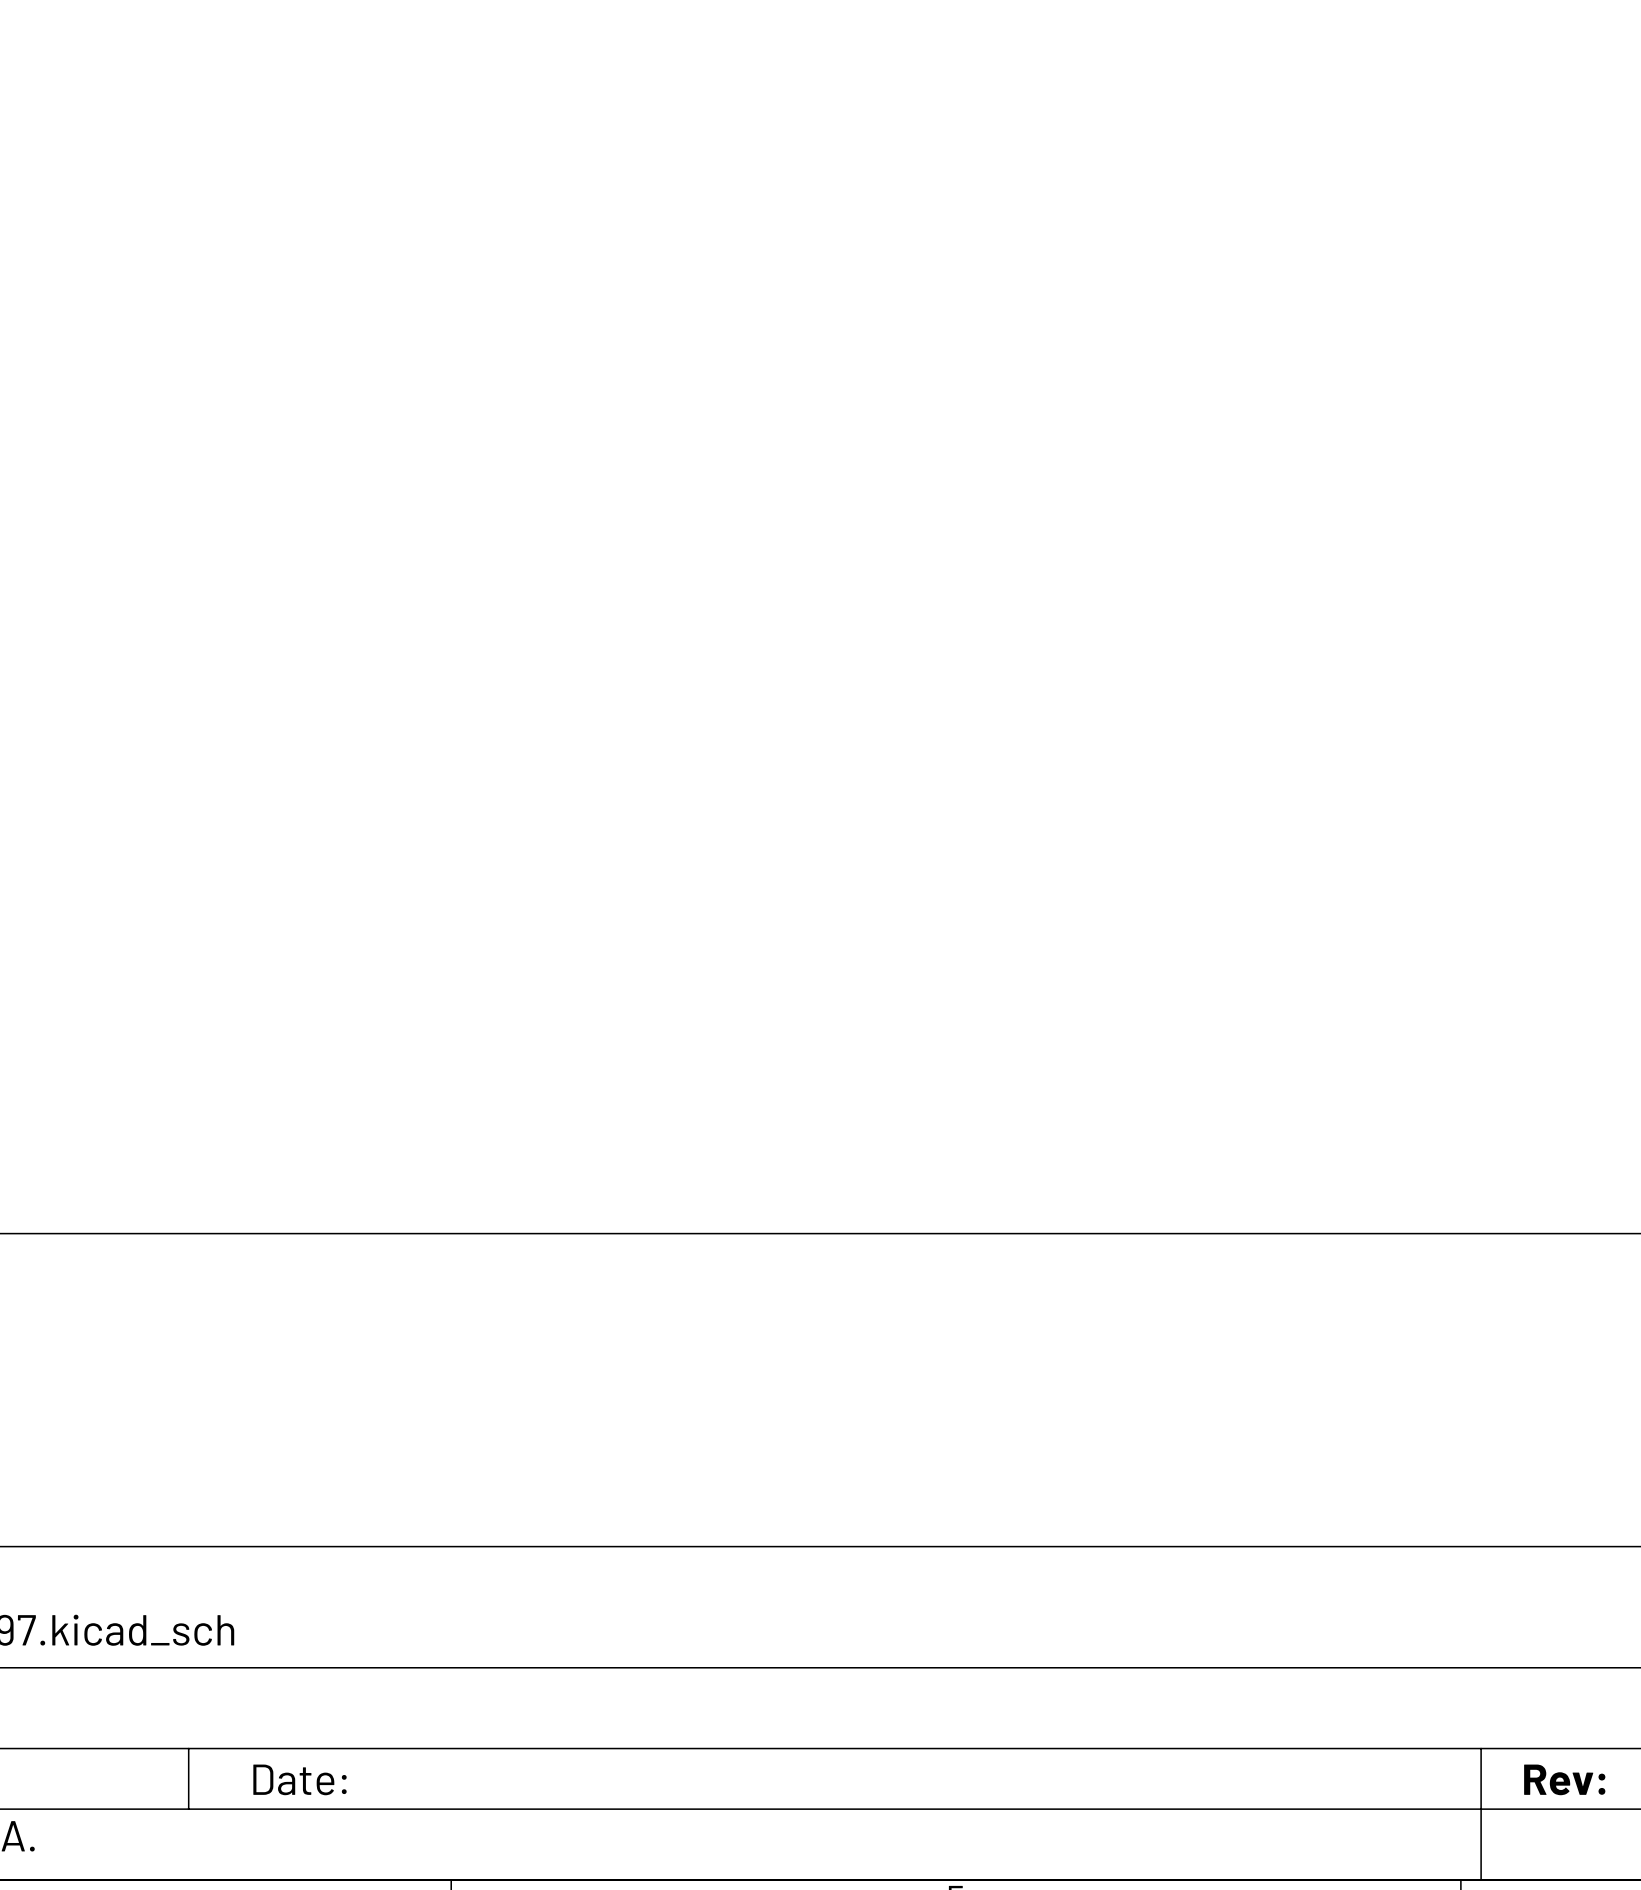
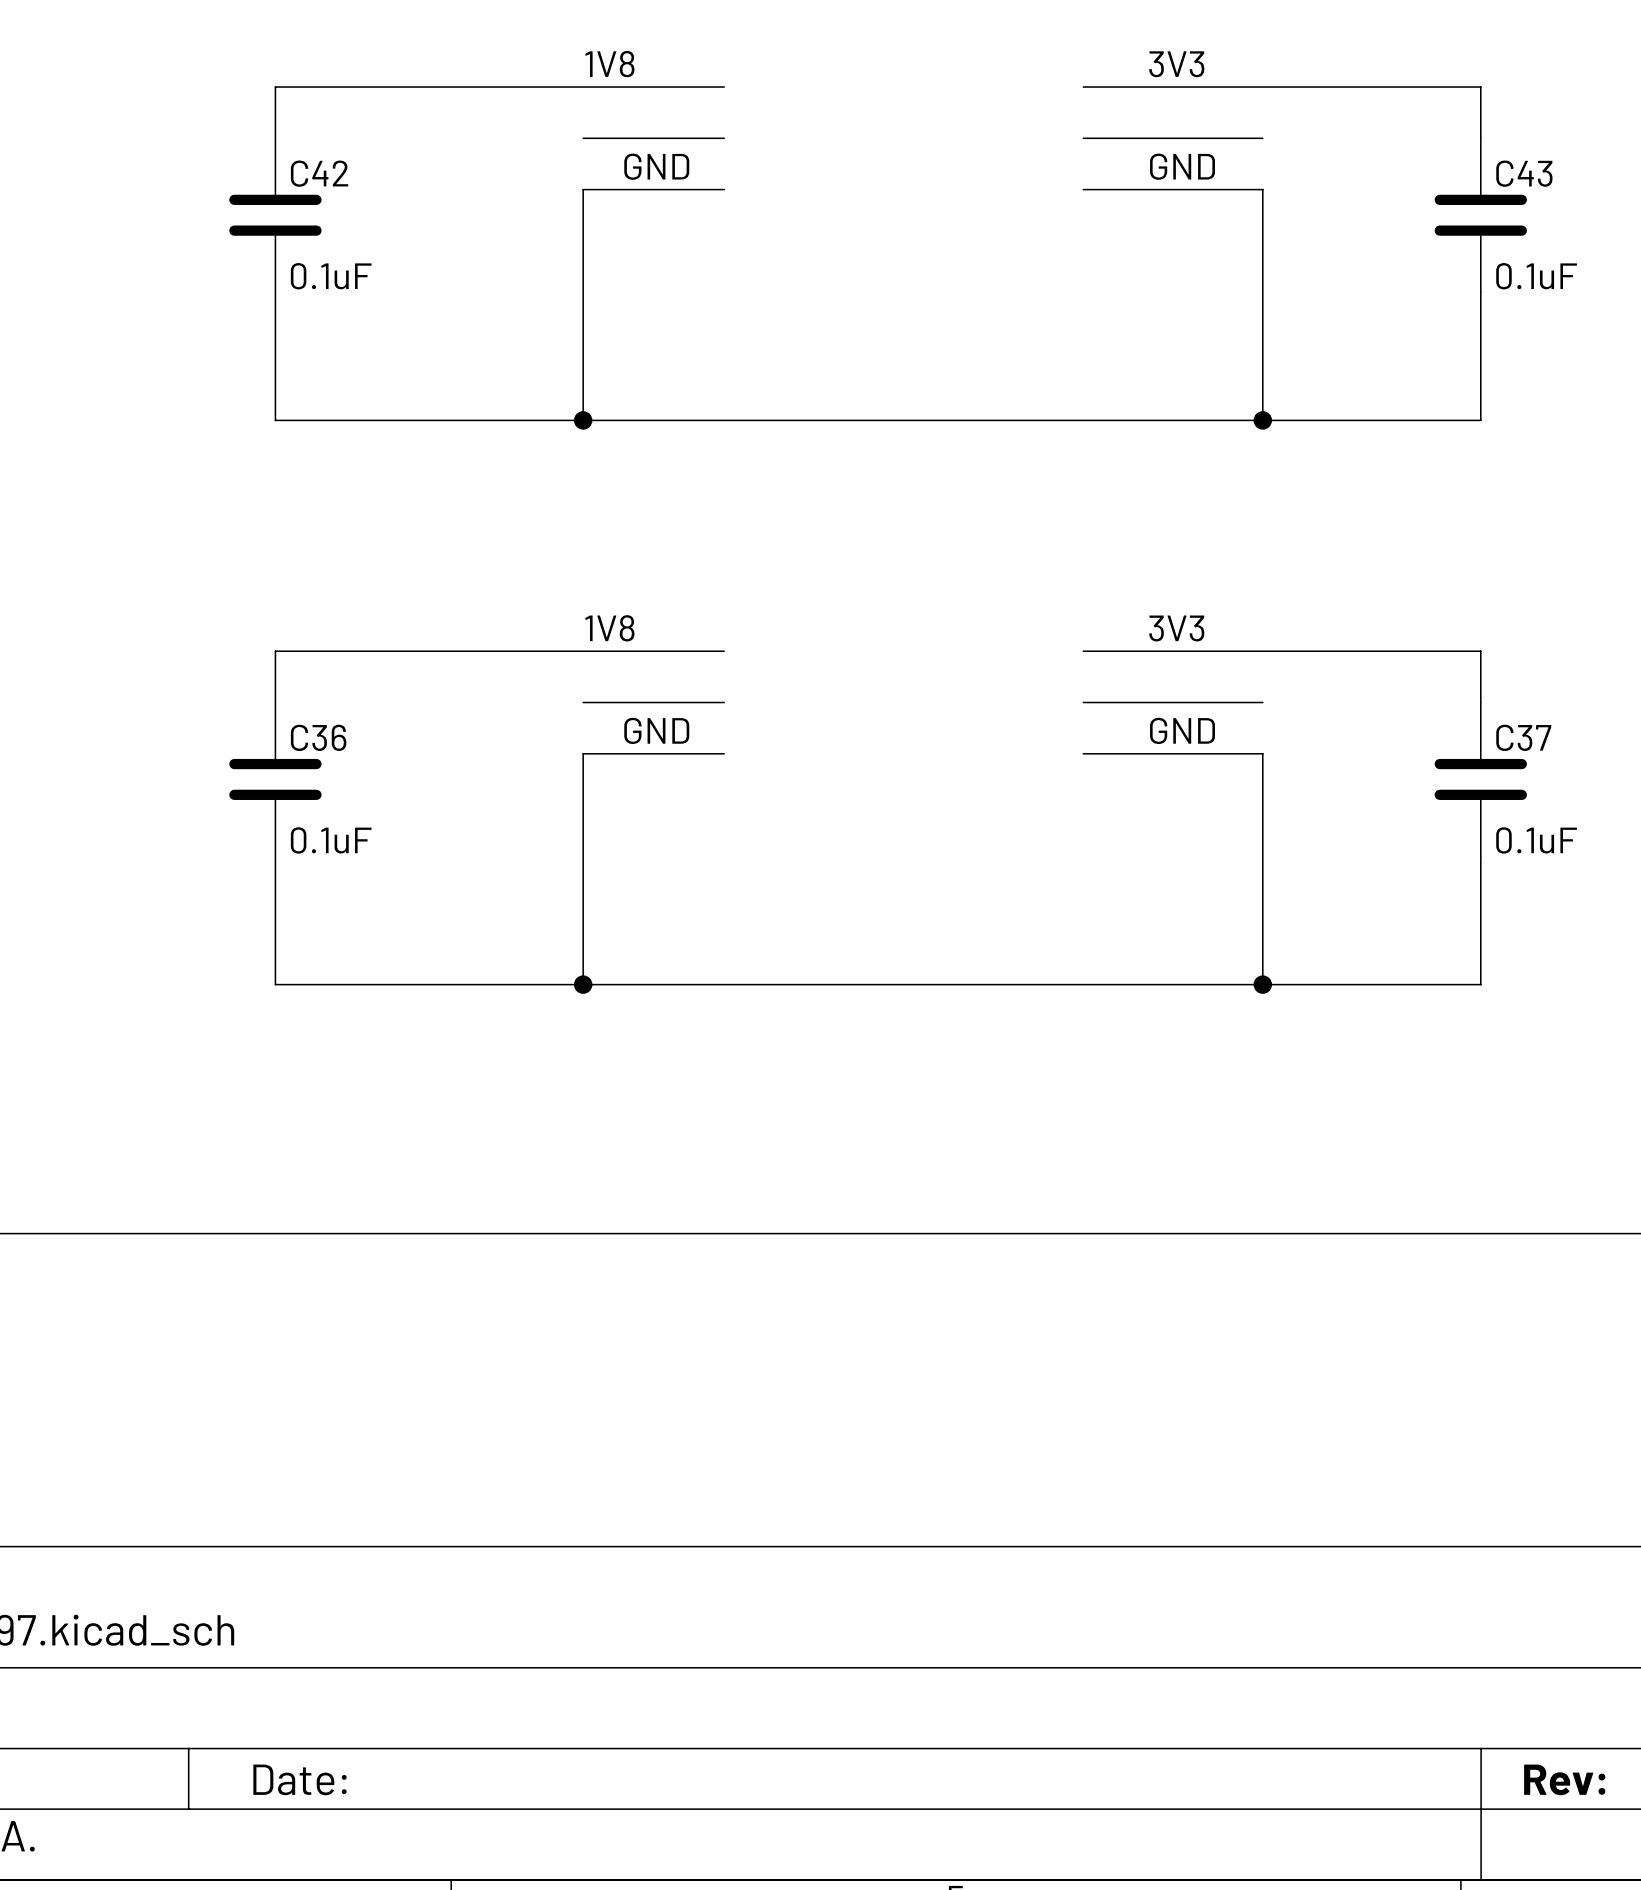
label: none -> 1V8 (609, 64)
label: none -> 3V3 (1176, 64)
wire: none -> (724, 87) (275, 87) (275, 138)
wire: none -> (1083, 87) (1480, 87) (1480, 138)
wire: none -> (583, 138) (724, 138)
wire: none -> (1083, 138) (1262, 138)
label: none -> GND (656, 166)
label: none -> GND (1182, 166)
wire: none -> (724, 189) (583, 189) (583, 420)
wire: none -> (1083, 189) (1262, 189) (1262, 420)
C42: none -> 0.1uF (275, 215)
C43: none -> 0.1uF (1480, 215)
wire: none -> (275, 292) (275, 420) (1480, 420) (1480, 292)
junction: none -> (583, 420)
junction: none -> (1262, 420)
label: none -> 1V8 (609, 628)
label: none -> 3V3 (1176, 628)
wire: none -> (724, 651) (275, 651) (275, 702)
wire: none -> (1083, 651) (1480, 651) (1480, 702)
wire: none -> (583, 702) (724, 702)
wire: none -> (1083, 702) (1262, 702)
label: none -> GND (656, 730)
label: none -> GND (1182, 730)
wire: none -> (724, 753) (583, 753) (583, 984)
wire: none -> (1083, 753) (1262, 753) (1262, 984)
C36: none -> 0.1uF (275, 779)
C37: none -> 0.1uF (1480, 779)
wire: none -> (275, 856) (275, 984) (1480, 984) (1480, 856)
junction: none -> (583, 984)
junction: none -> (1262, 984)

